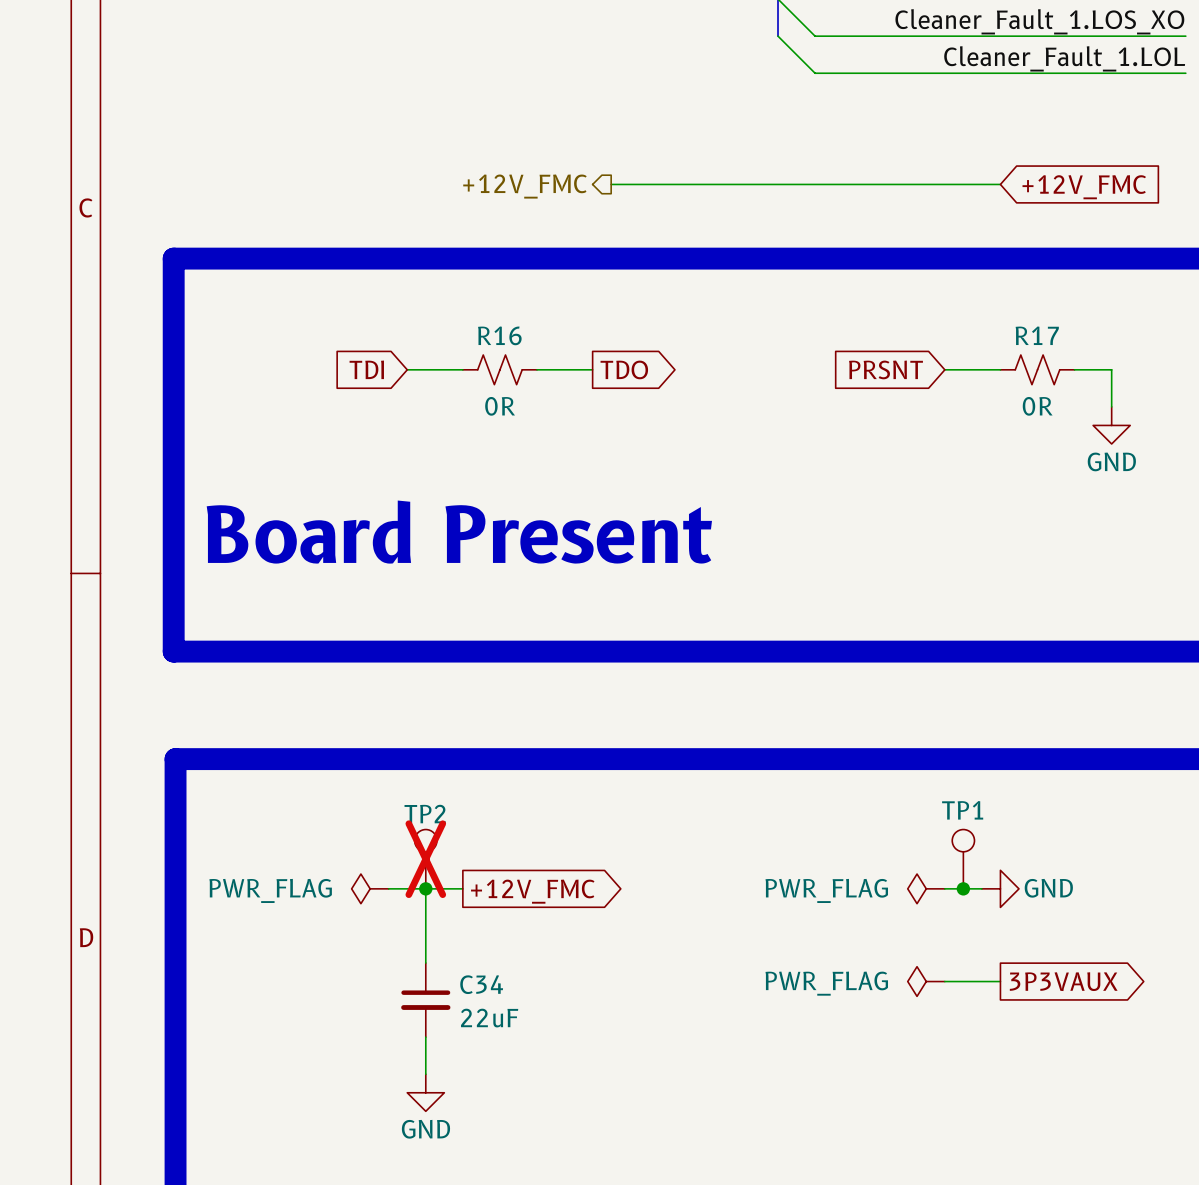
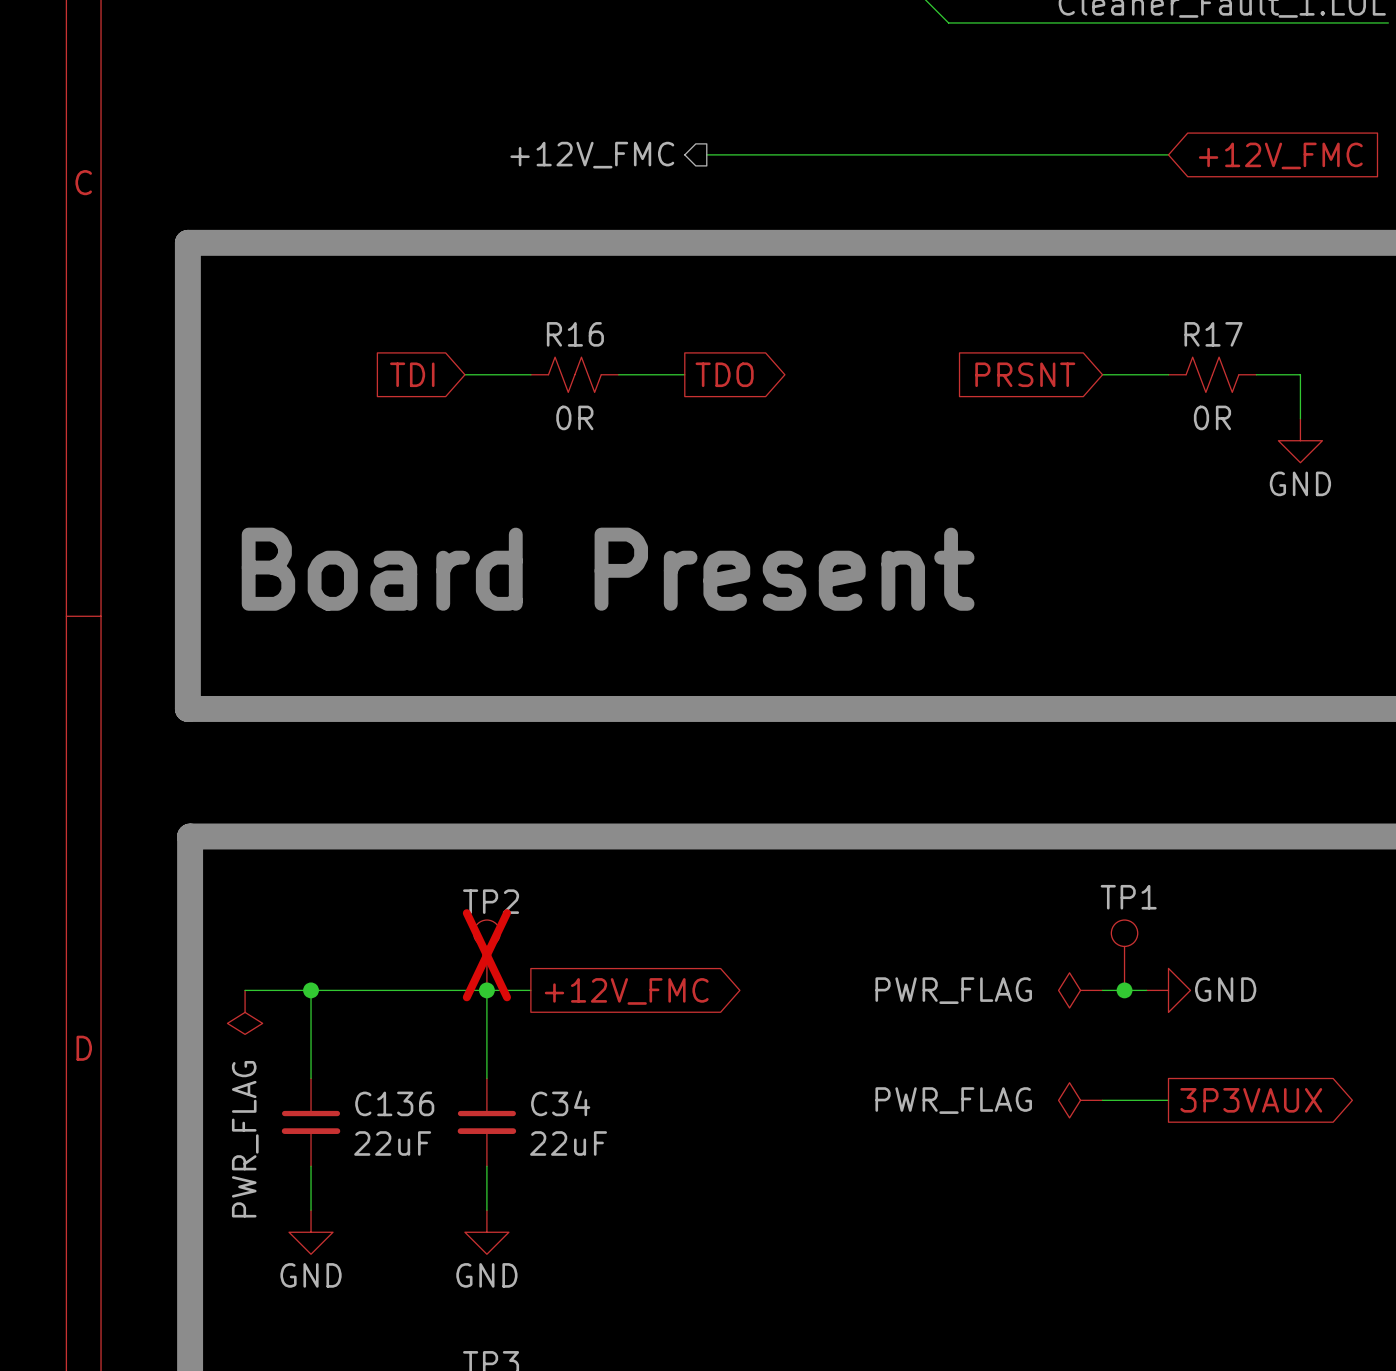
wire: none -> (245, 990) (442, 990)
wire: none -> (311, 990) (311, 1078)
junction: none -> (311, 990)
power symbol rotation: 0° (370, 888) -> 90° counterclockwise (245, 1012)
power symbol position: PWR_FLAG (370, 888) -> PWR_FLAG (245, 1012)
C136: none -> 22uF (311, 1122)
wire: none -> (311, 1166) (311, 1210)
power symbol: none -> GND (311, 1232)

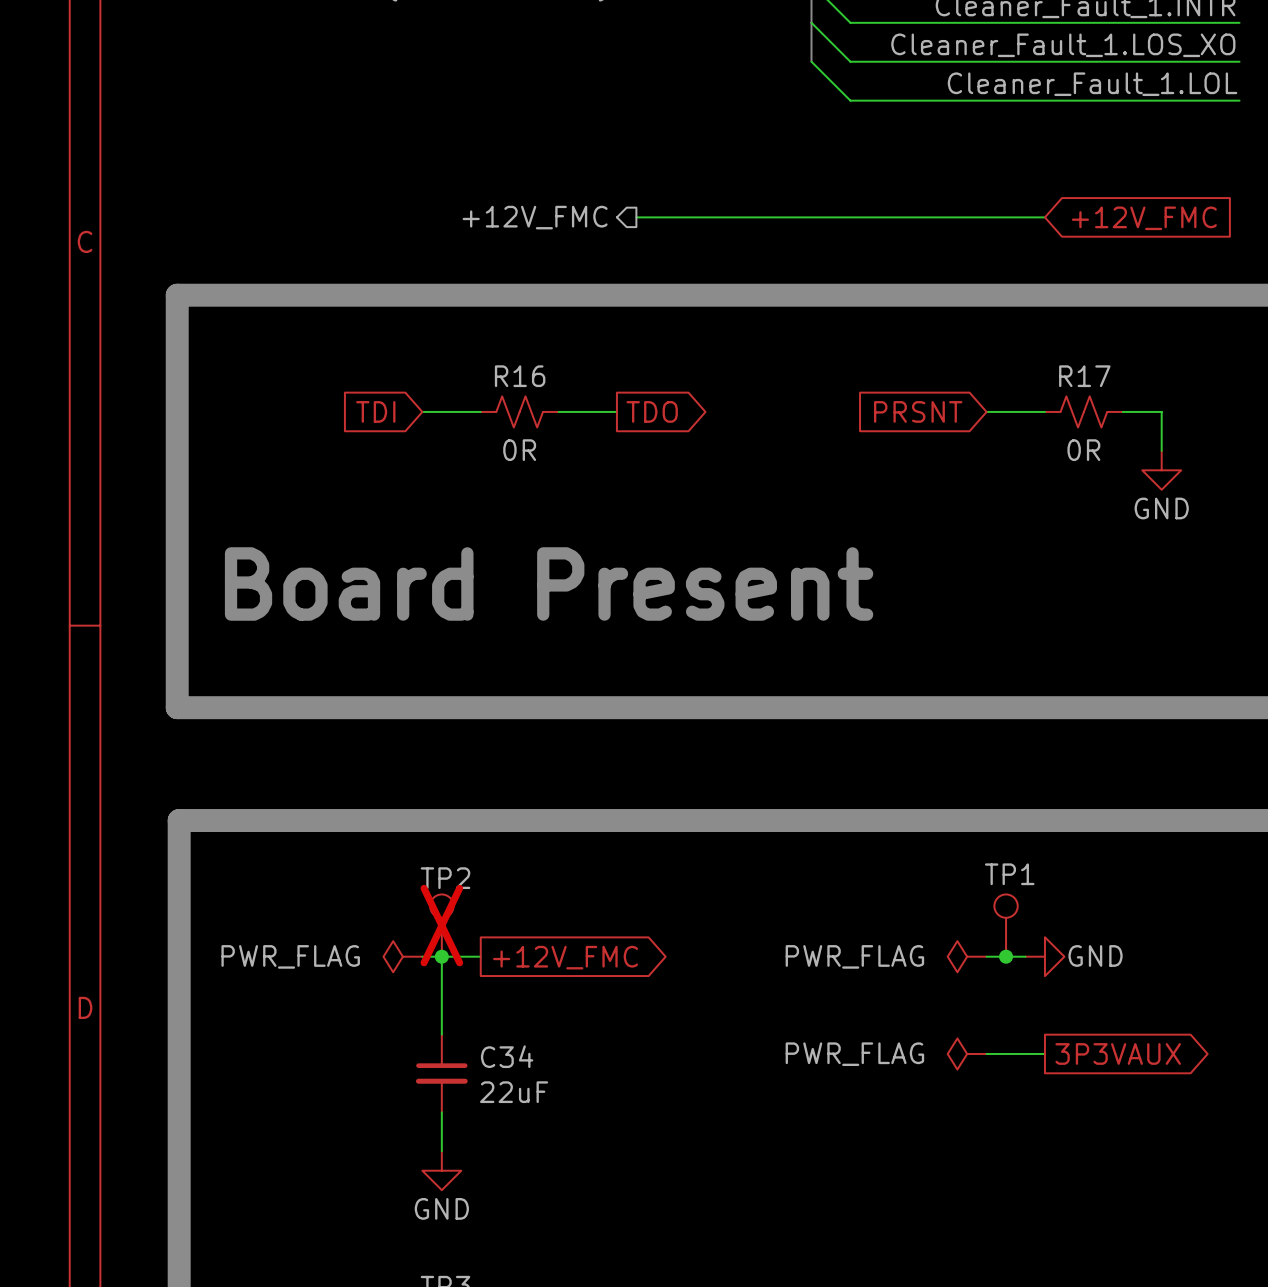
wire: (245, 990) (464, 990) -> none
wire: (311, 990) (311, 1078) -> none
junction: (311, 990) -> none
power symbol rotation: 0° (245, 1012) -> 90° clockwise (402, 956)
power symbol position: PWR_FLAG (245, 1012) -> PWR_FLAG (402, 956)
C136: 22uF (311, 1122) -> none
wire: (311, 1166) (311, 1210) -> none
power symbol: GND (311, 1232) -> none

